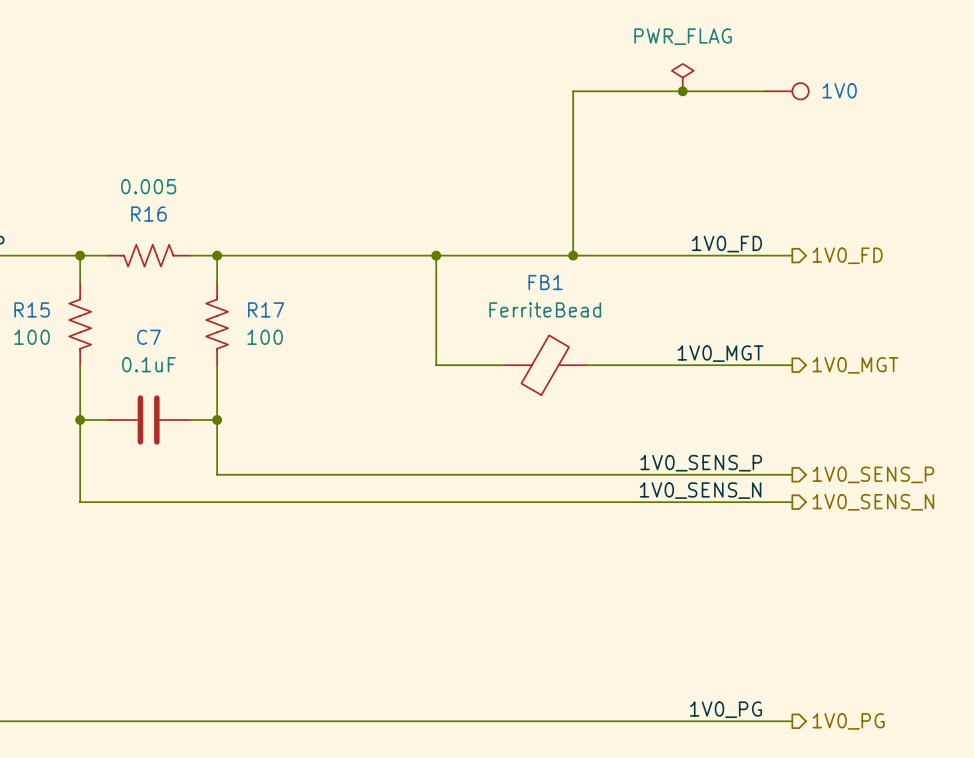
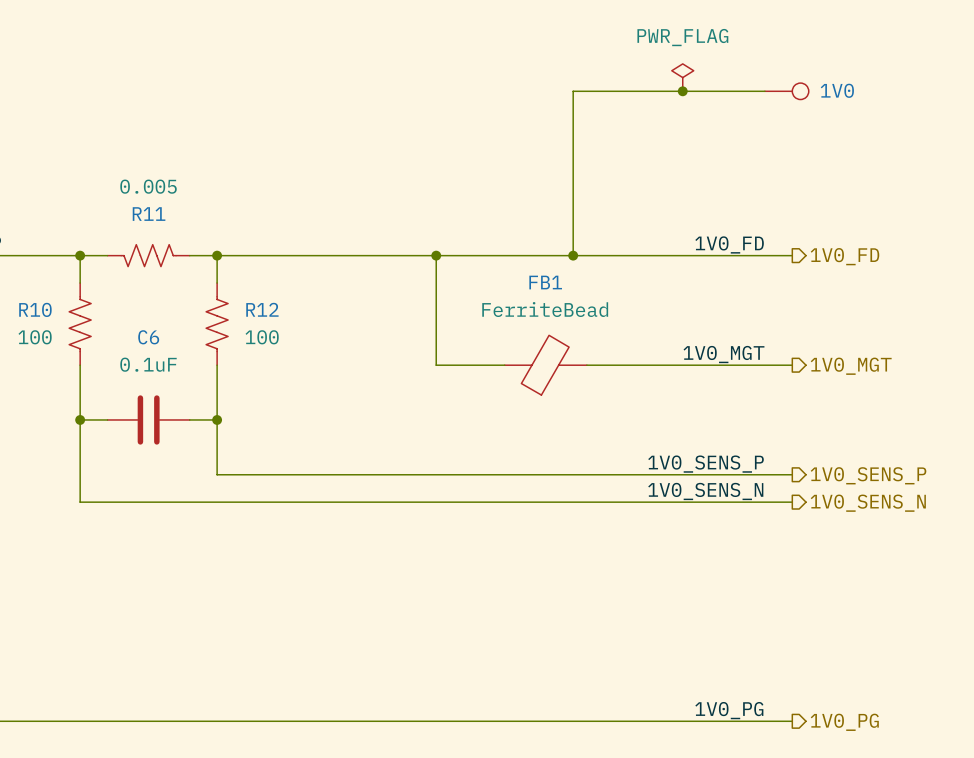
R16 name: R16 (148, 214) -> R11 (149, 214)
R15: 100 (80, 324) -> none
R10: none -> 100 (80, 324)
R17: 100 (217, 324) -> none
R12: none -> 100 (217, 324)
C7 name: C7 (148, 337) -> C6 (148, 337)

